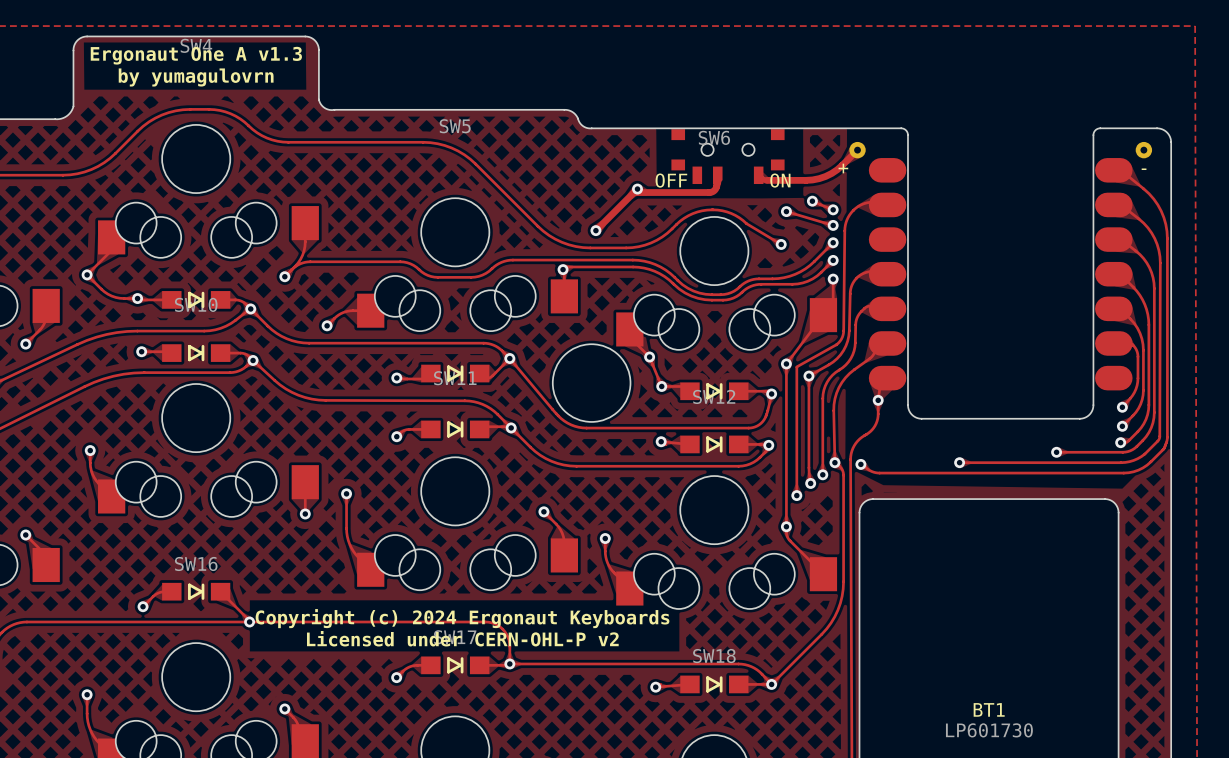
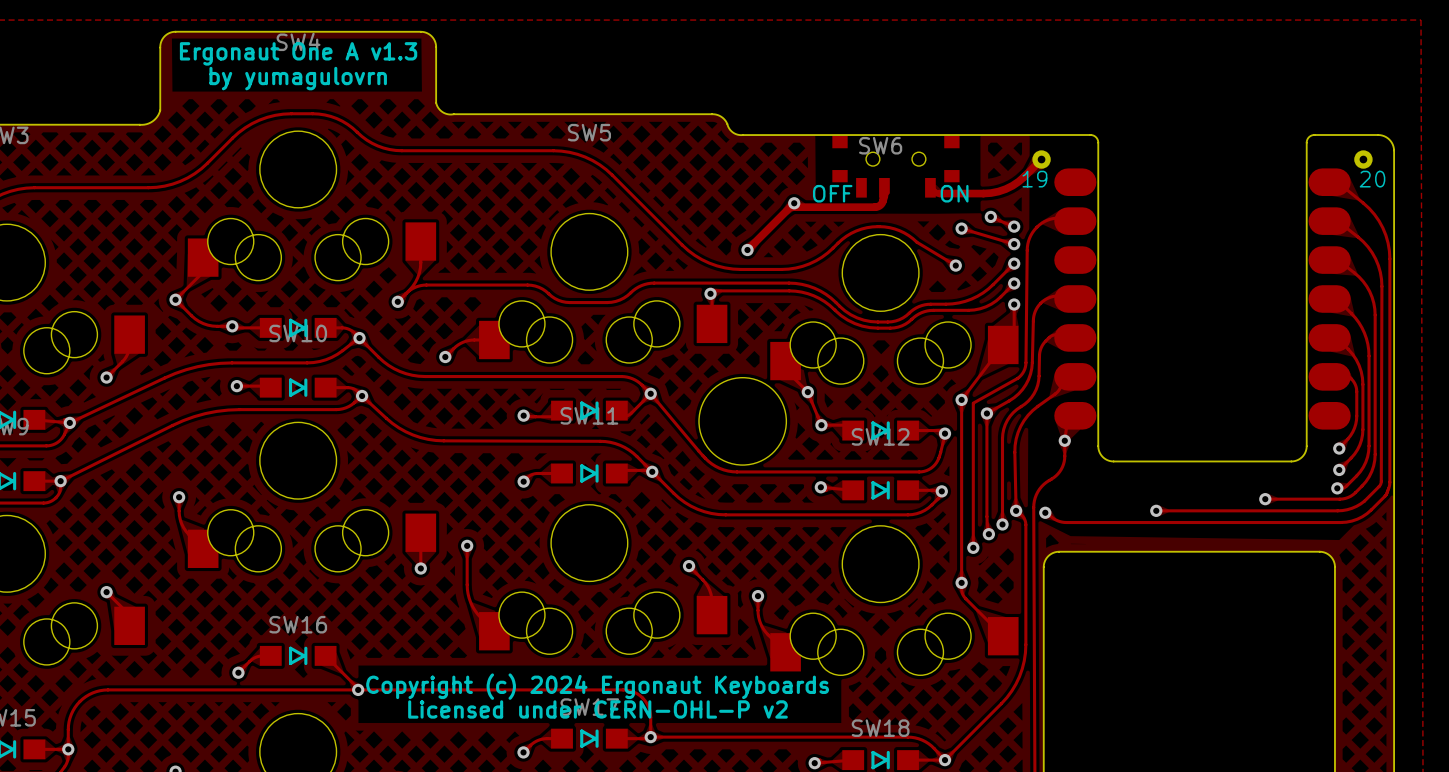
part text: + (843, 168) -> 19 (1034, 179)
part text: - (1144, 169) -> 20 (1372, 179)

